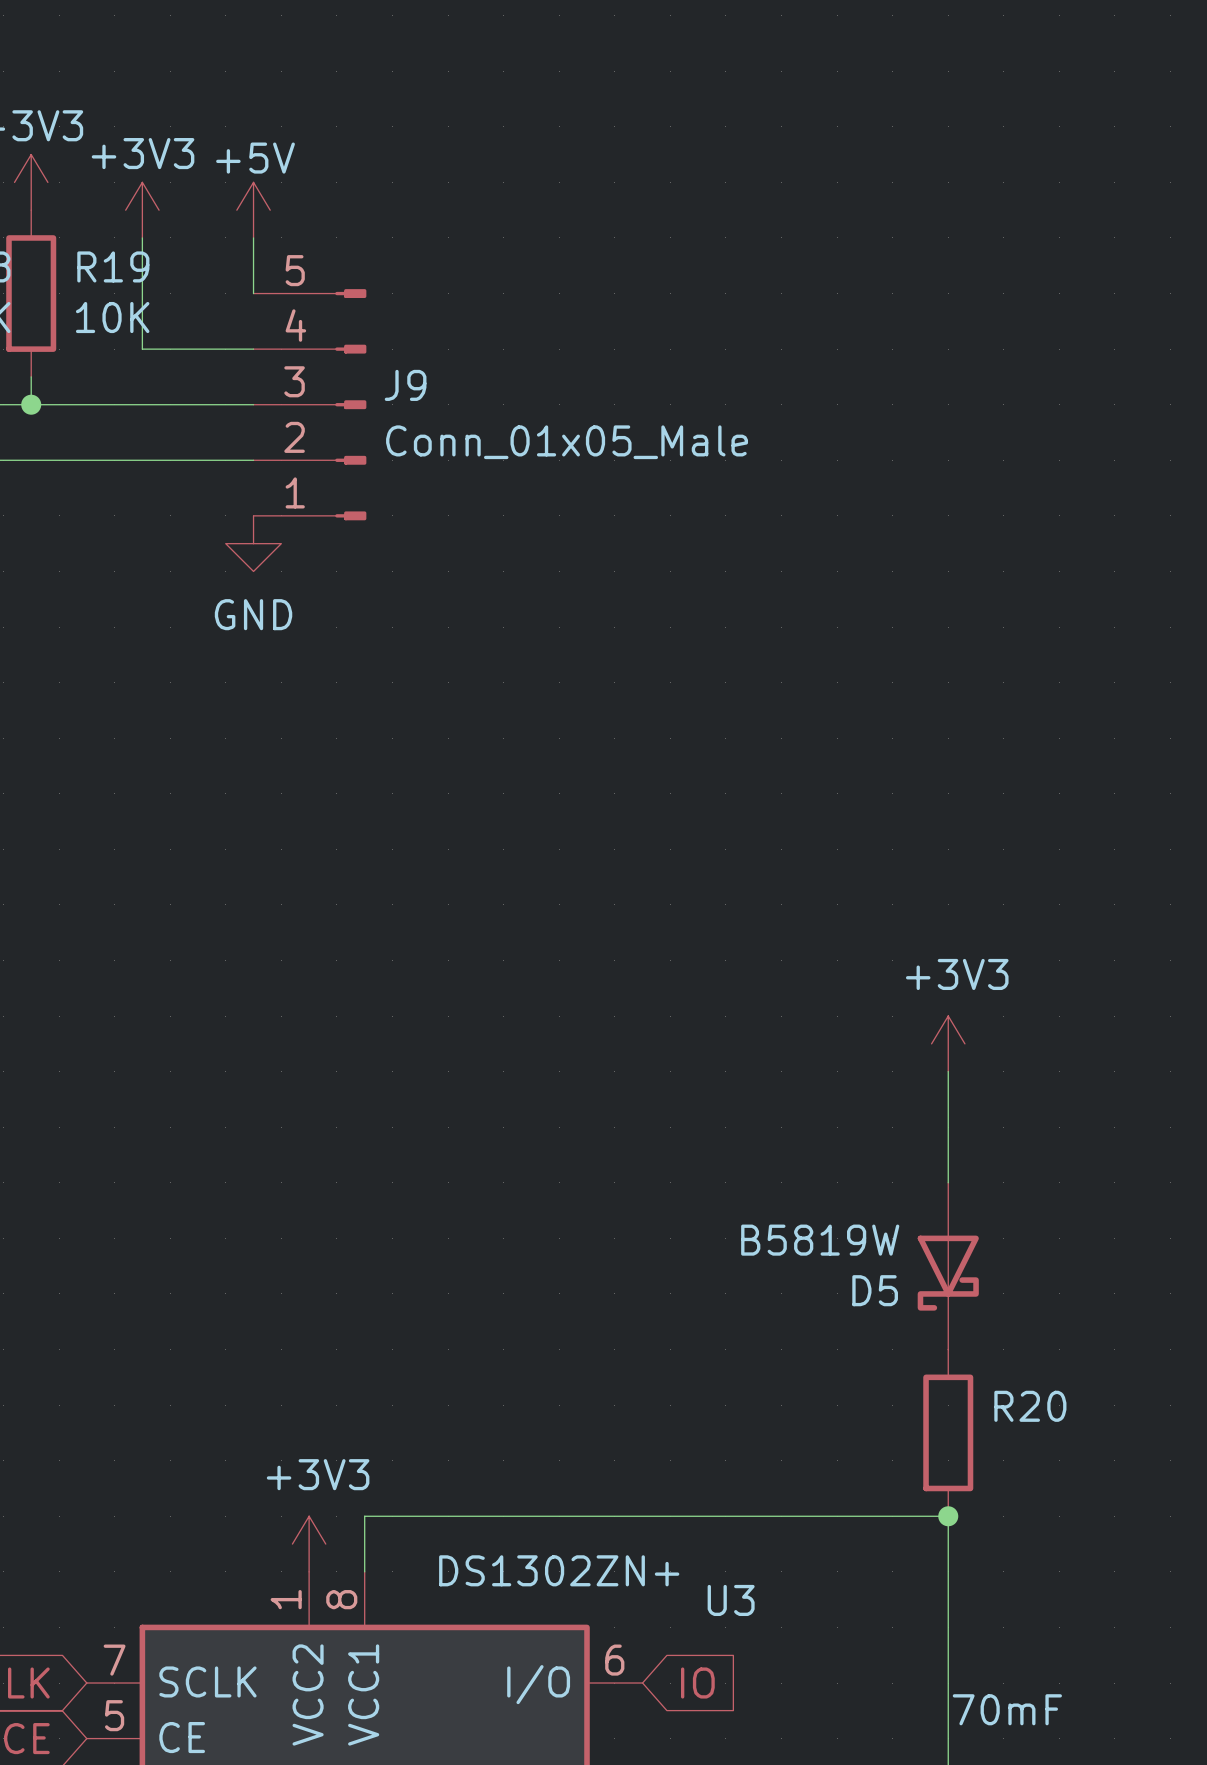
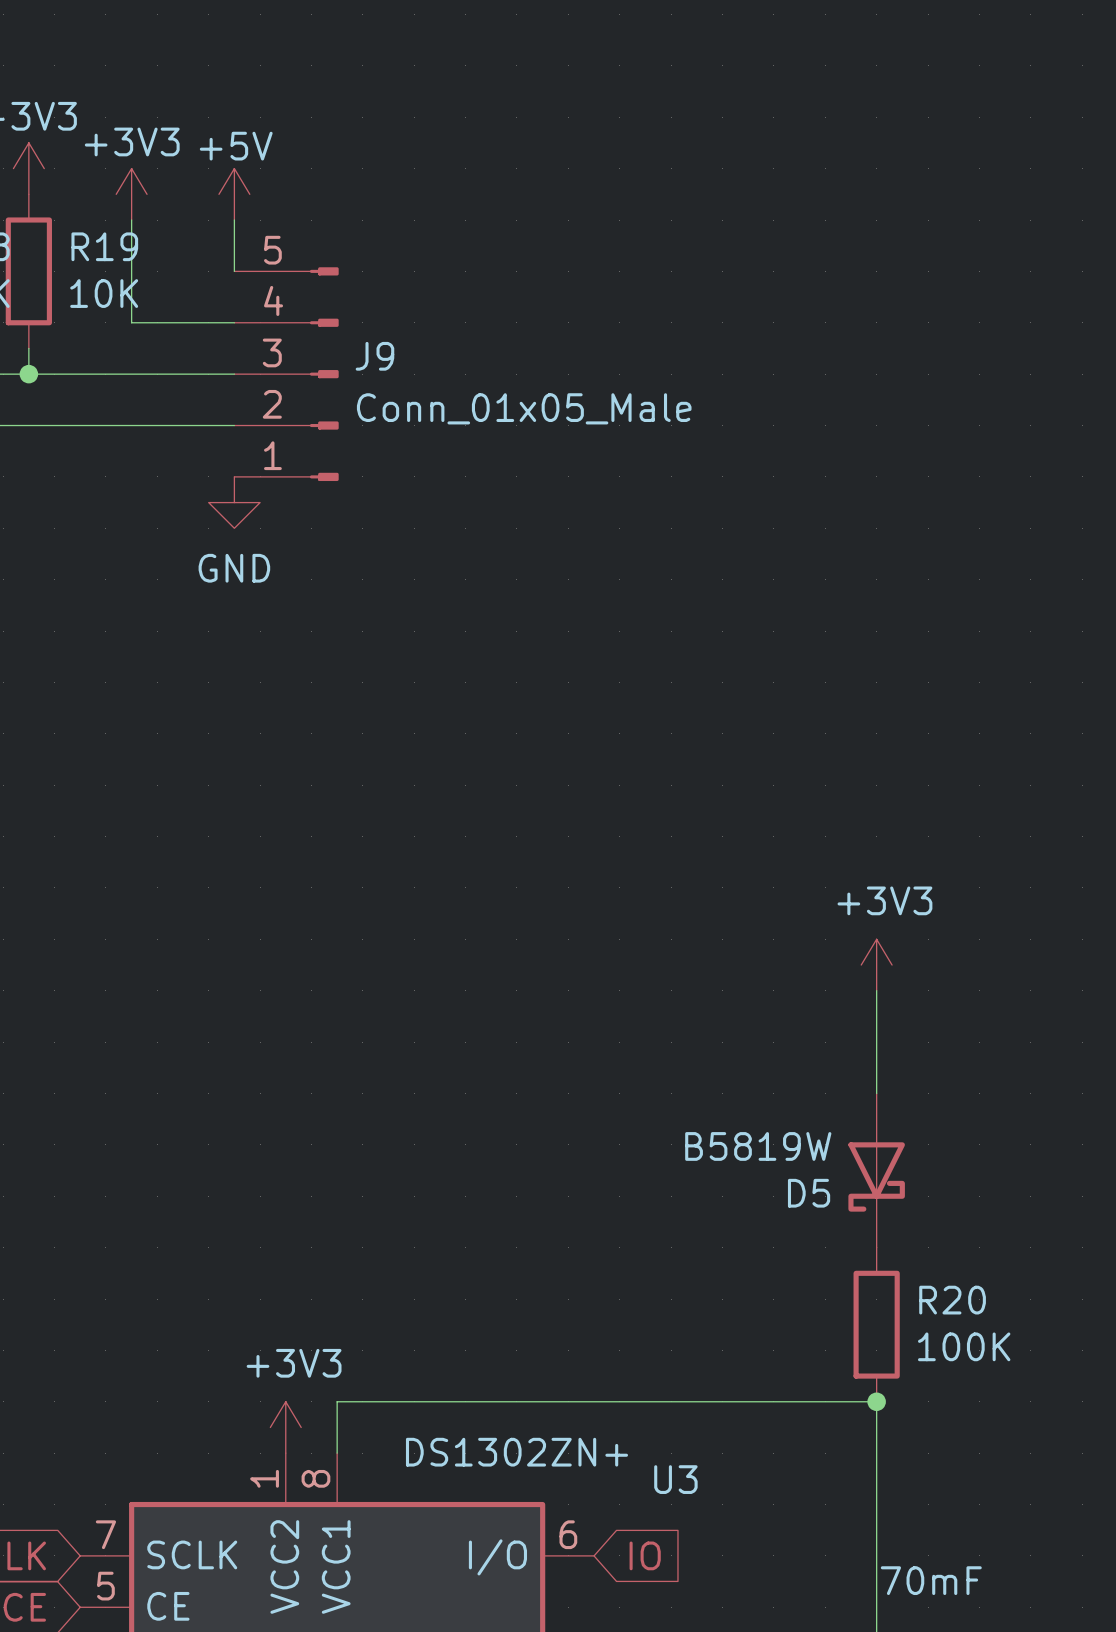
R20 value: none -> 100K (964, 1346)

